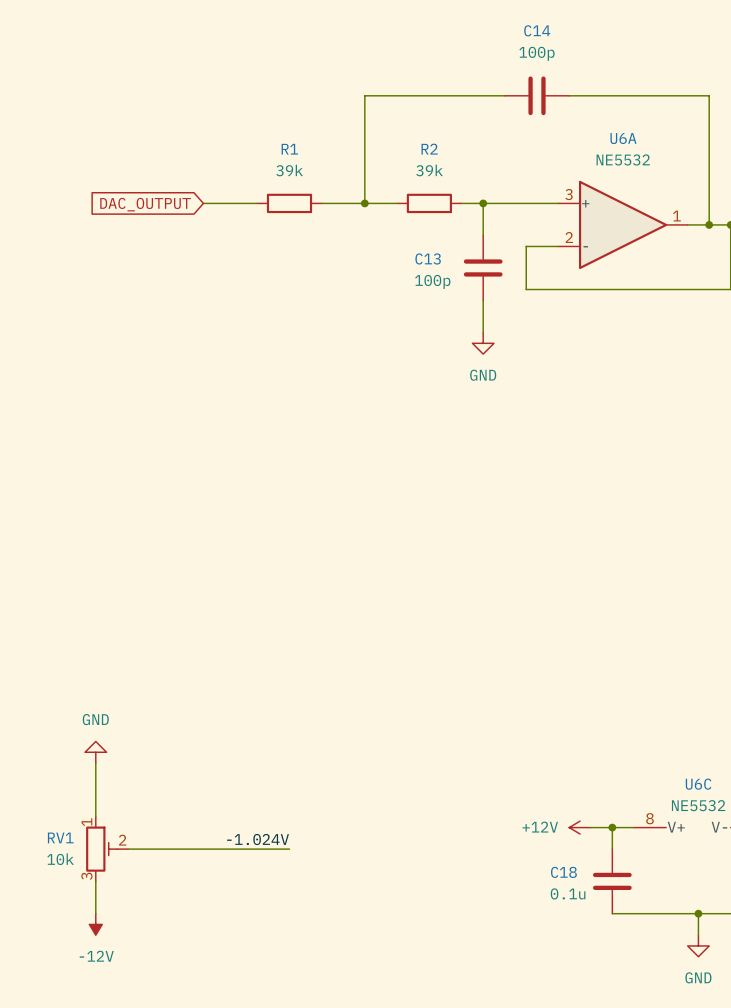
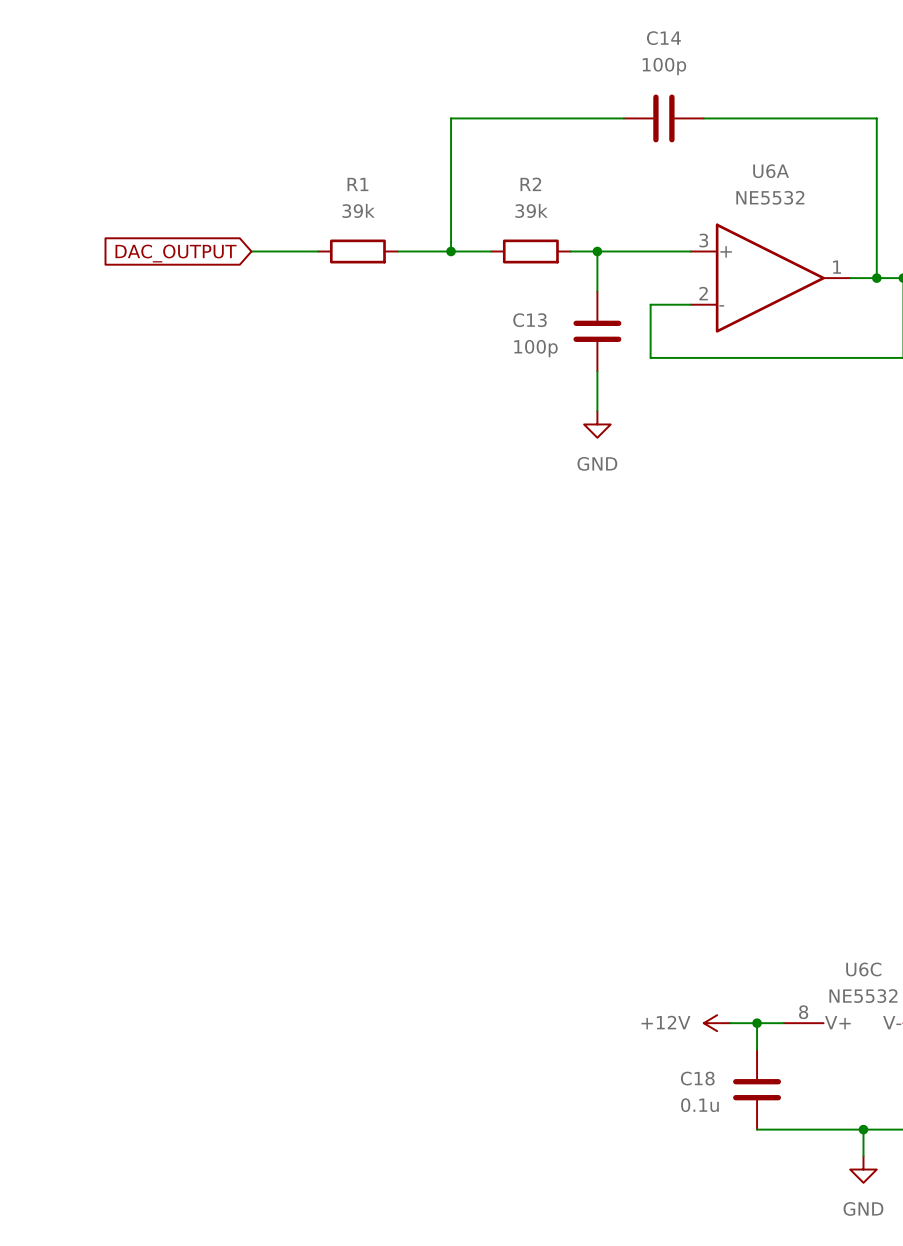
power symbol: GND (95, 752) -> none
wire: (95, 763) (95, 816) -> none
label: -1.024V (258, 839) -> none
RV1: 10k (107, 849) -> none
wire: (128, 849) (289, 849) -> none
wire: (95, 881) (95, 913) -> none
power symbol: -12V (95, 924) -> none

